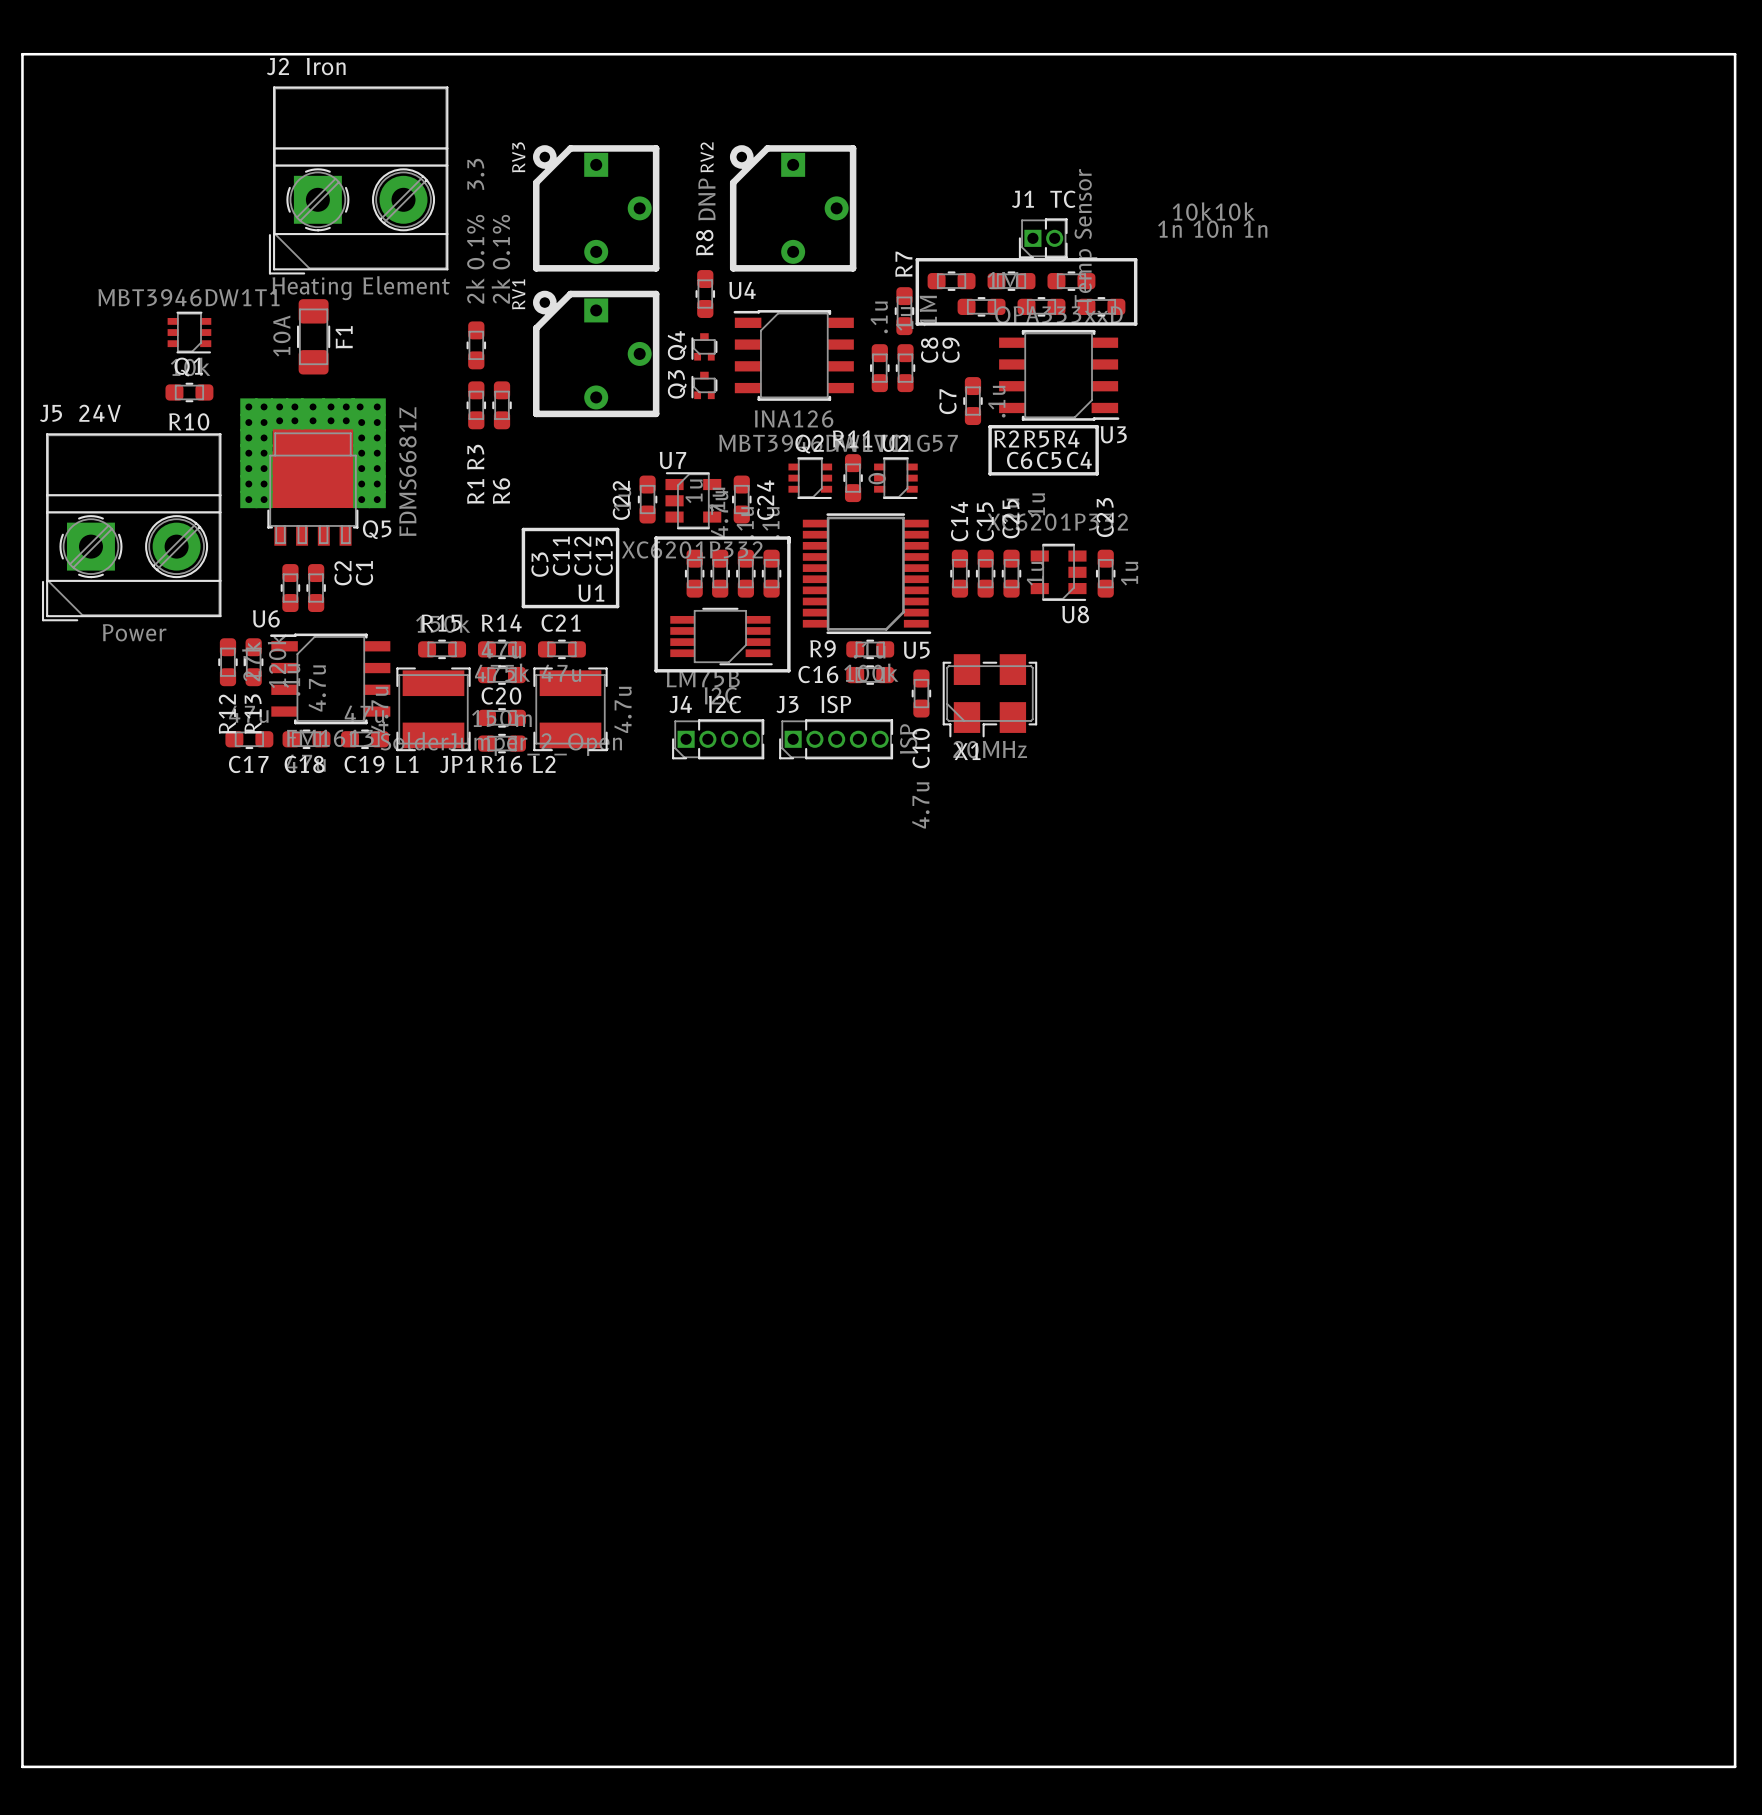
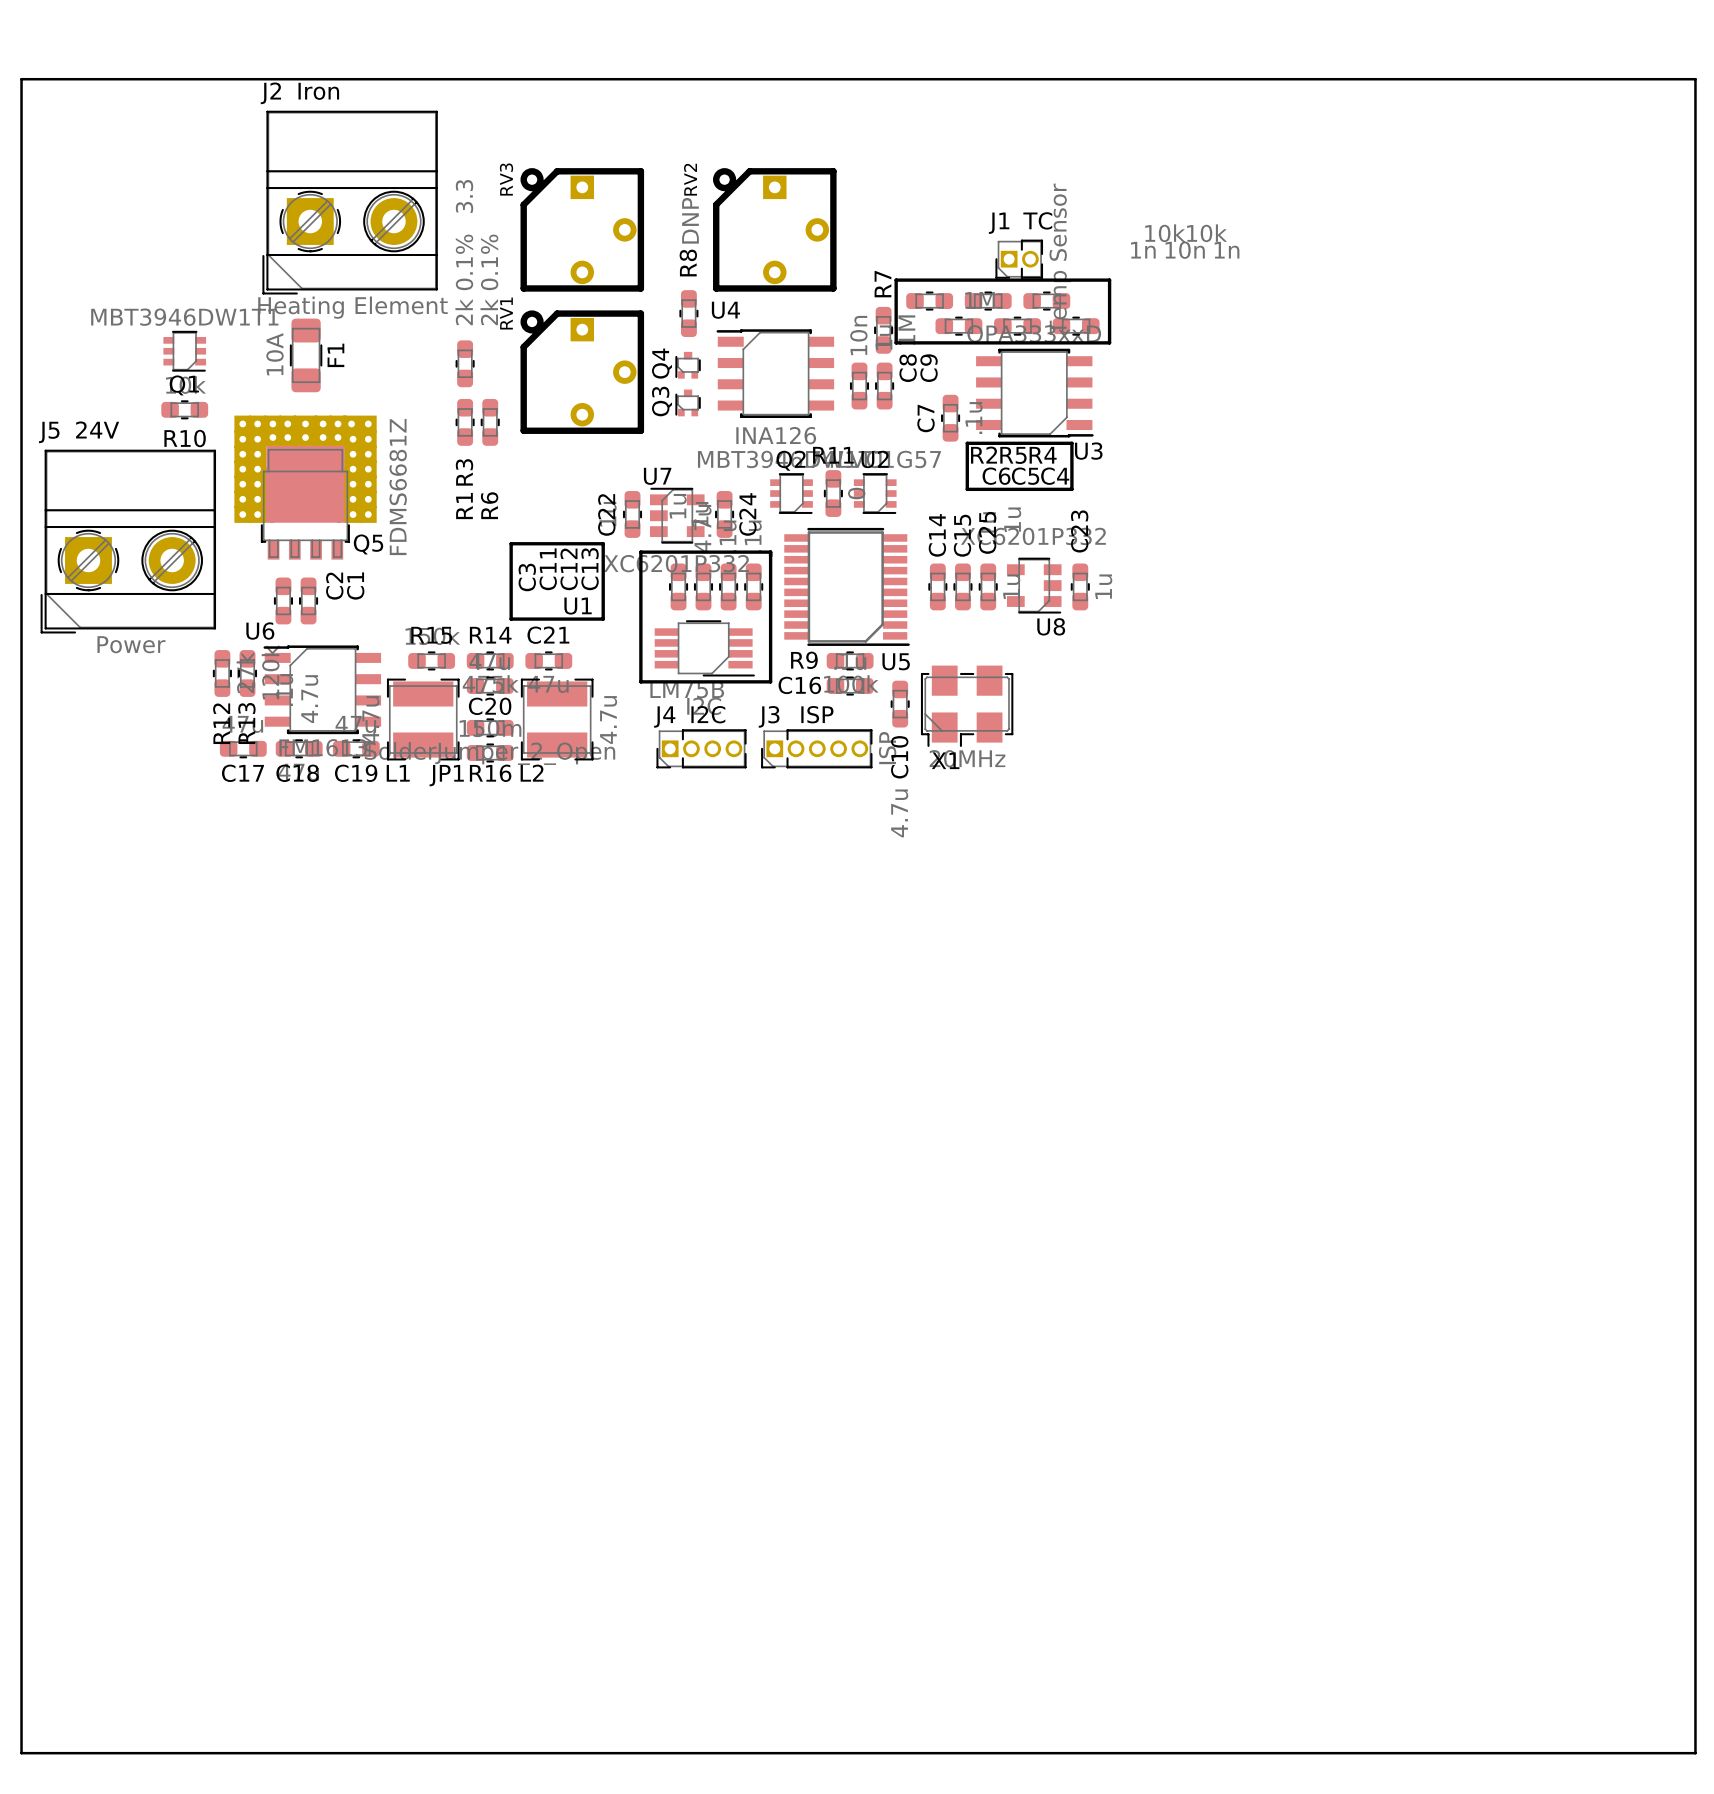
C8 value: .1u (879, 317) -> 10n (858, 335)

